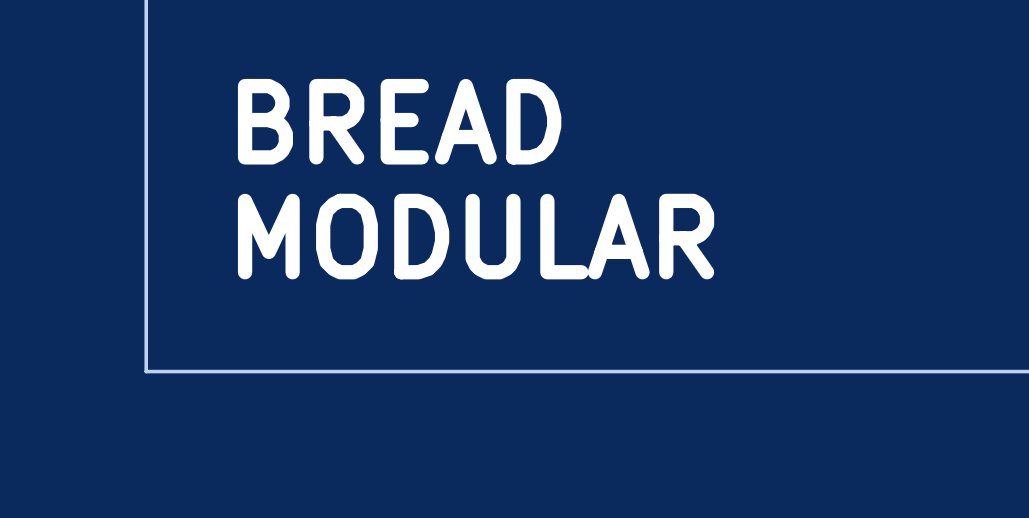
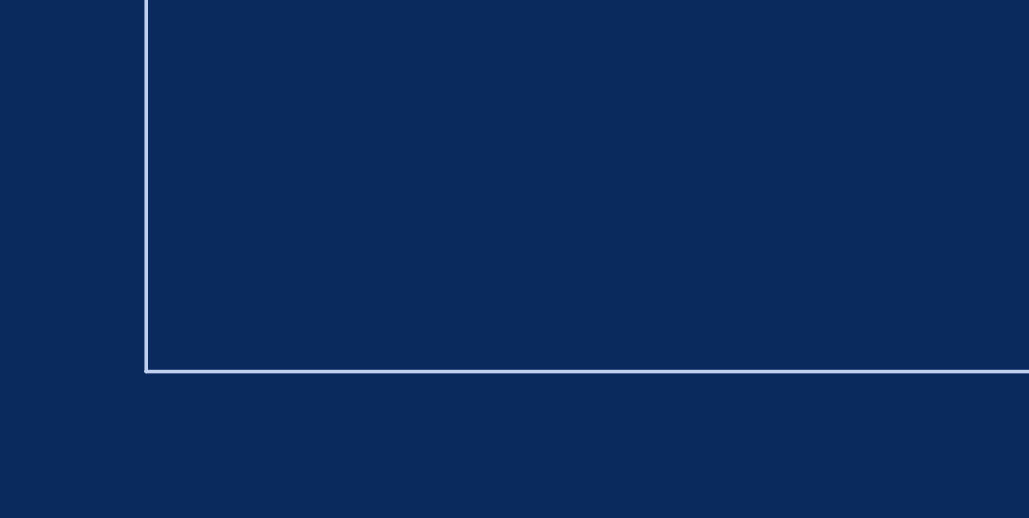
text: BREAD (399, 121) -> none
text: MODULAR (476, 236) -> none

